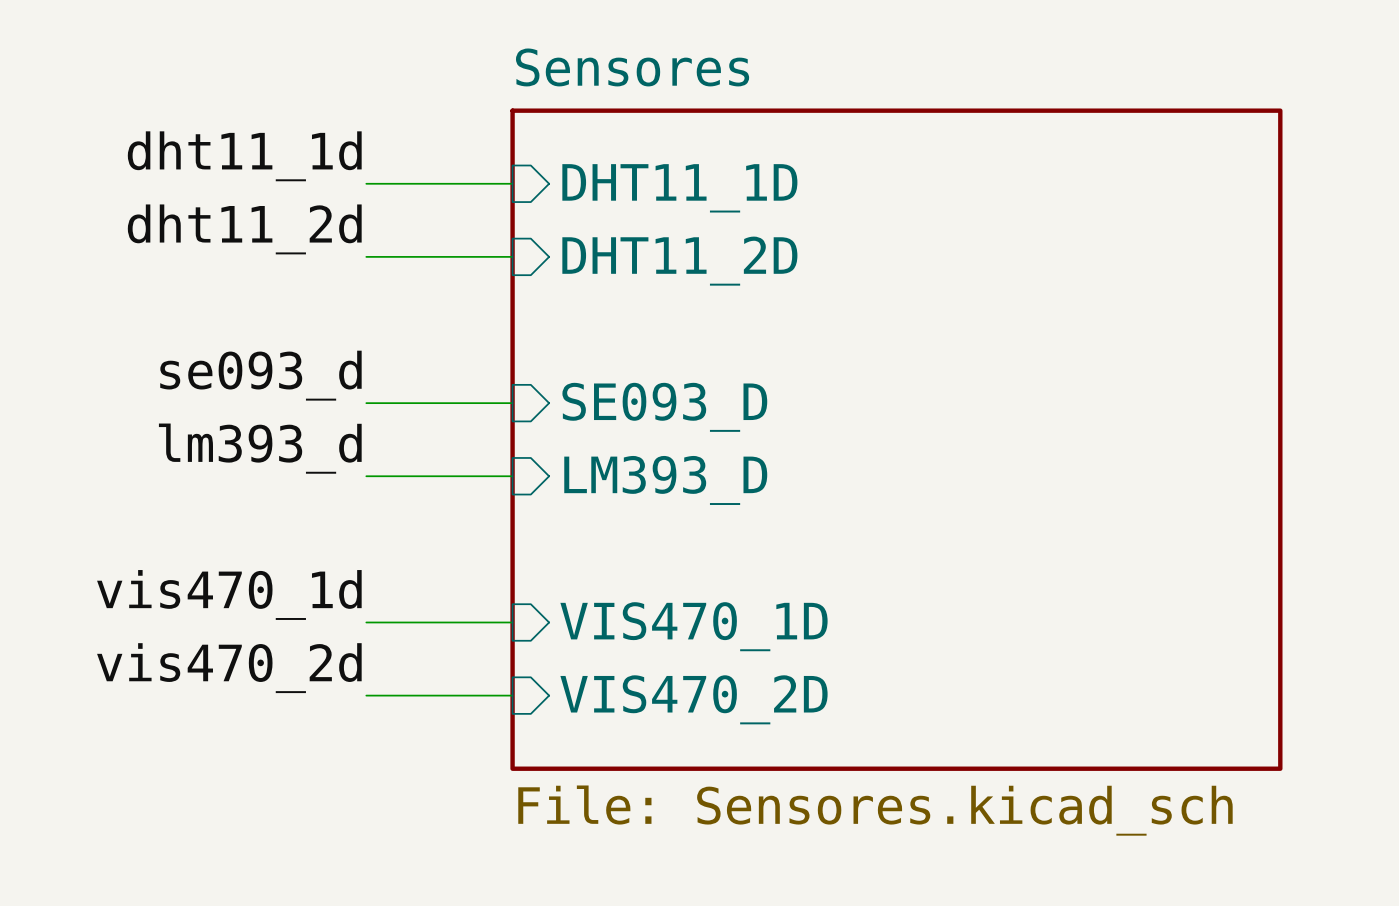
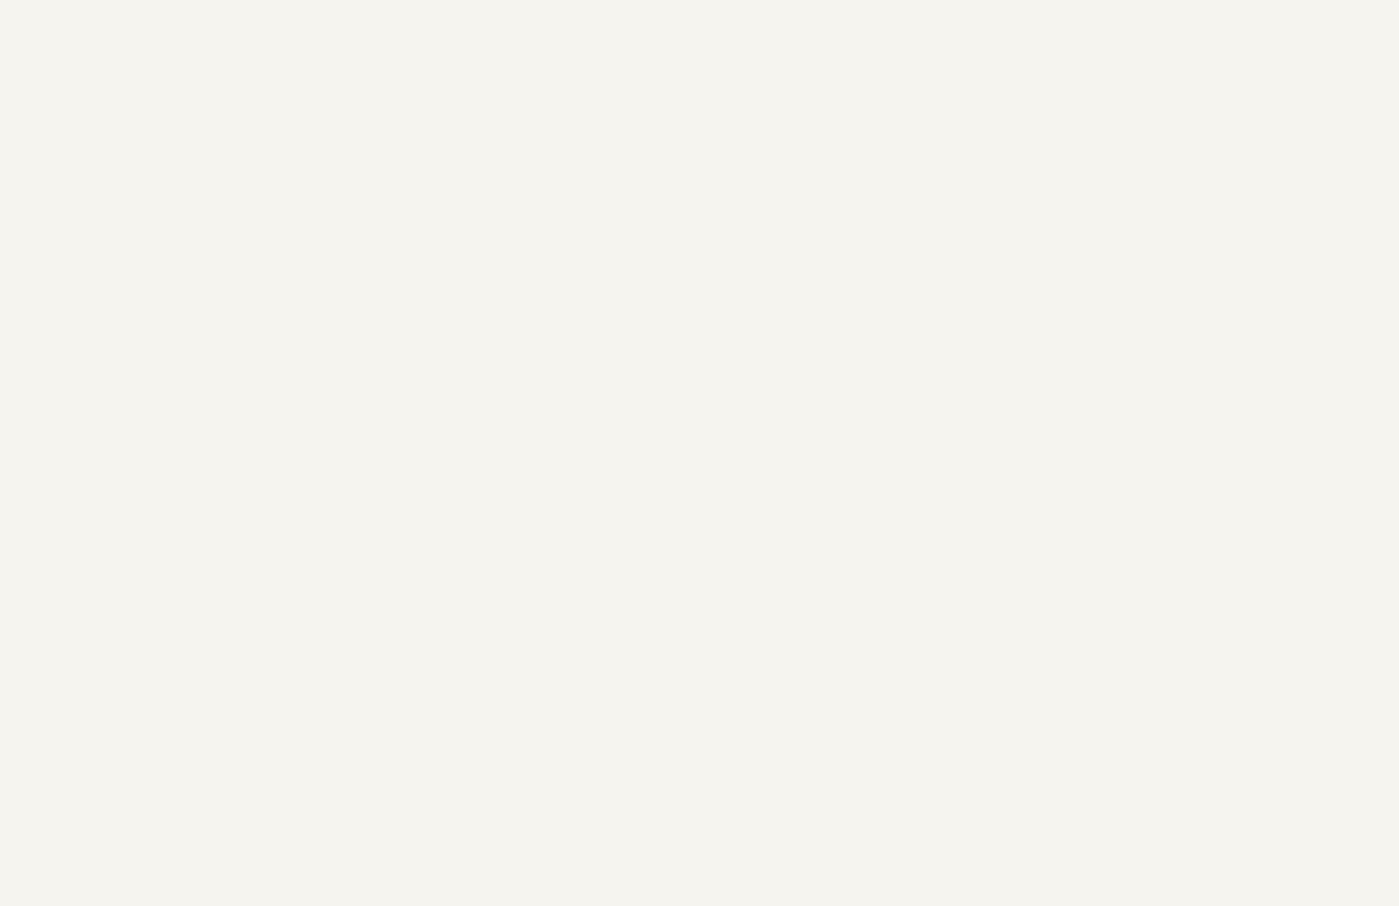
label: dht11_1d (244, 156) -> none
wire: (366, 183) (512, 183) -> none
sheet pin: DHT11_1D (679, 188) -> none
label: dht11_2d (244, 229) -> none
wire: (366, 256) (512, 256) -> none
sheet pin: DHT11_2D (679, 261) -> none
label: se093_d (260, 375) -> none
wire: (366, 403) (512, 403) -> none
sheet pin: SE093_D (664, 407) -> none
sheet Sensores: File: Sensores.kicad_sch (896, 439) -> none
label: lm393_d (260, 448) -> none
wire: (366, 476) (512, 476) -> none
sheet pin: LM393_D (665, 480) -> none
label: vis470_1d (229, 595) -> none
wire: (366, 622) (512, 622) -> none
sheet pin: VIS470_1D (694, 626) -> none
label: vis470_2d (229, 668) -> none
wire: (366, 695) (512, 695) -> none
sheet pin: VIS470_2D (694, 699) -> none

